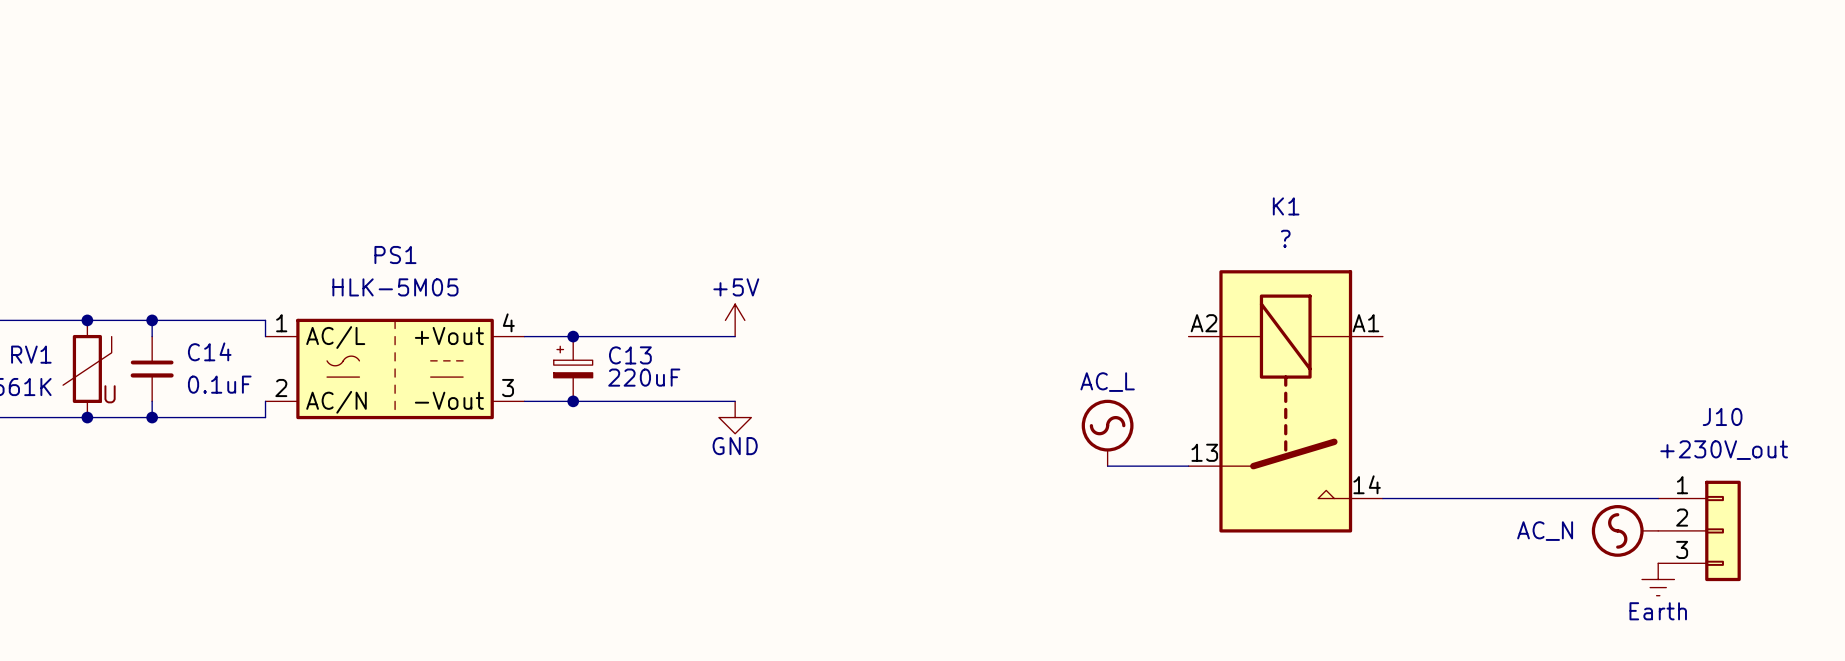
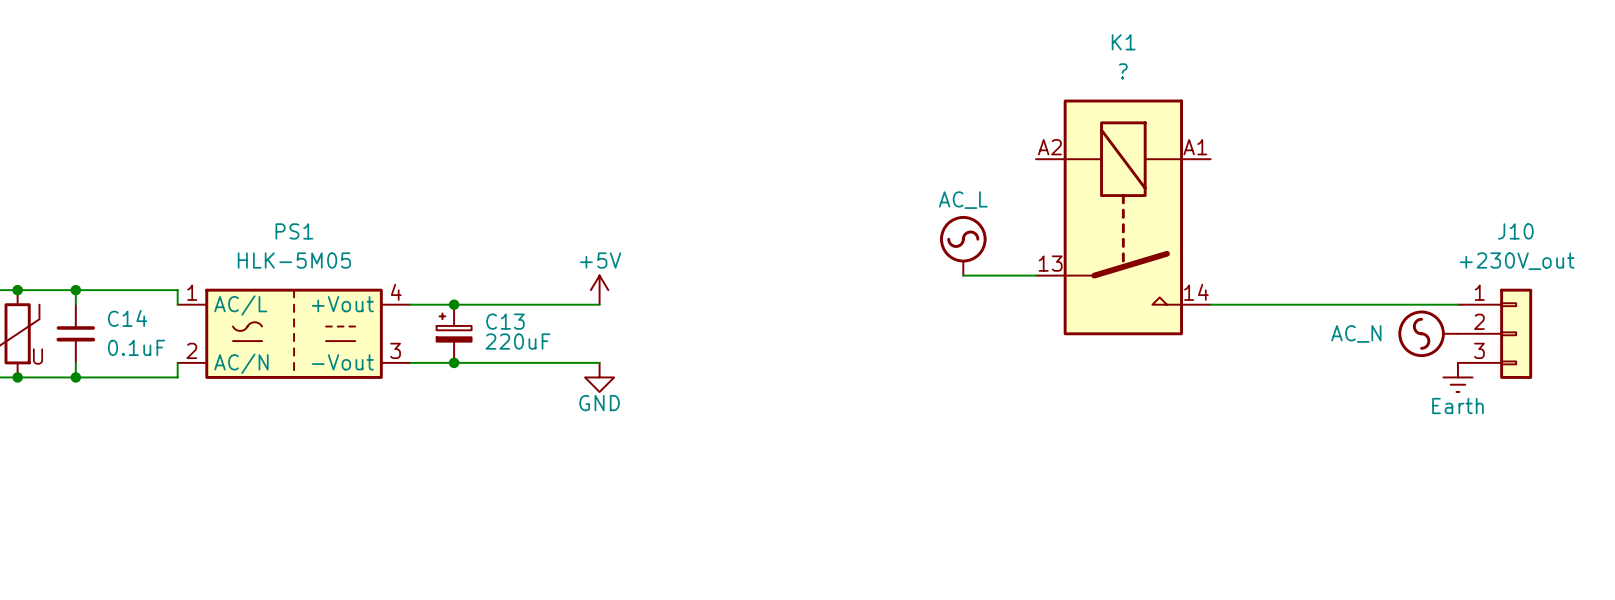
K1 position: (1285, 401) -> (1123, 217)
power symbol position: AC_L (1107, 432) -> AC_L (963, 245)
wire: (1107, 466) (1188, 466) -> (963, 275) (1036, 275)
wire: (1382, 498) (1658, 498) -> (1210, 304) (1457, 304)
power symbol position: AC_N (1625, 530) -> AC_N (1428, 333)
J10 position: (1699, 530) -> (1495, 333)
power symbol position: Earth (1658, 579) -> Earth (1457, 377)

